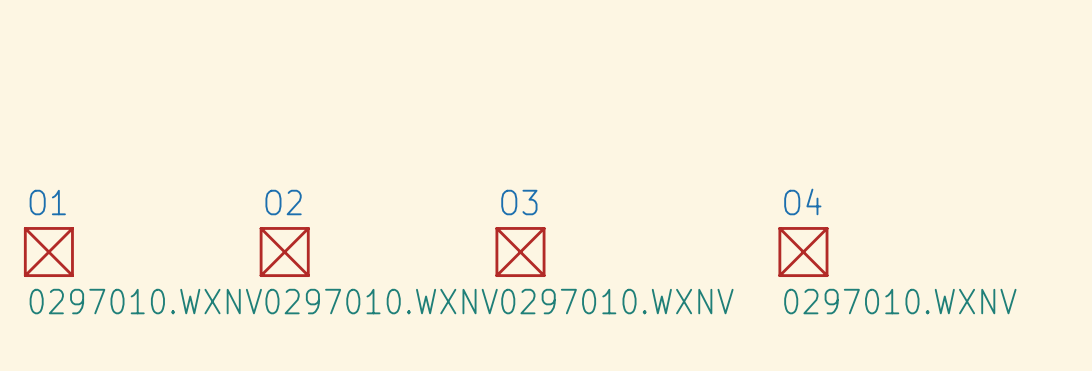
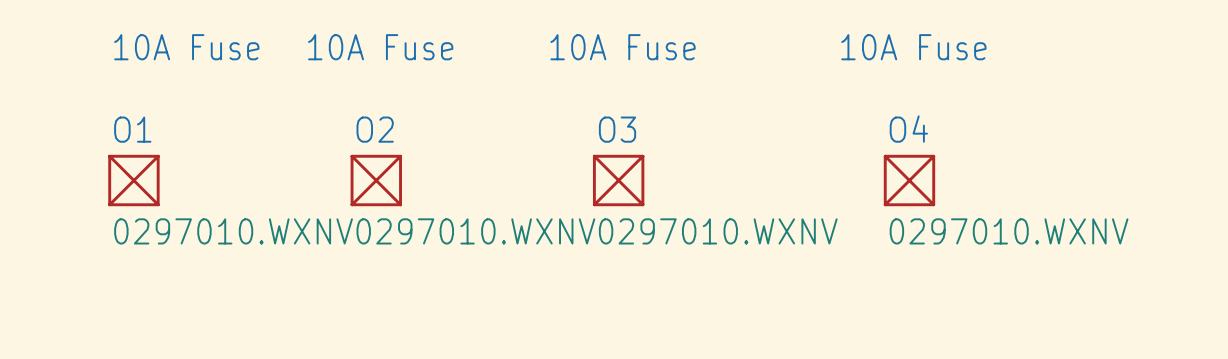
text: none -> 10A Fuse (186, 47)
text: none -> 10A Fuse (380, 47)
text: none -> 10A Fuse (623, 47)
text: none -> 10A Fuse (913, 47)

